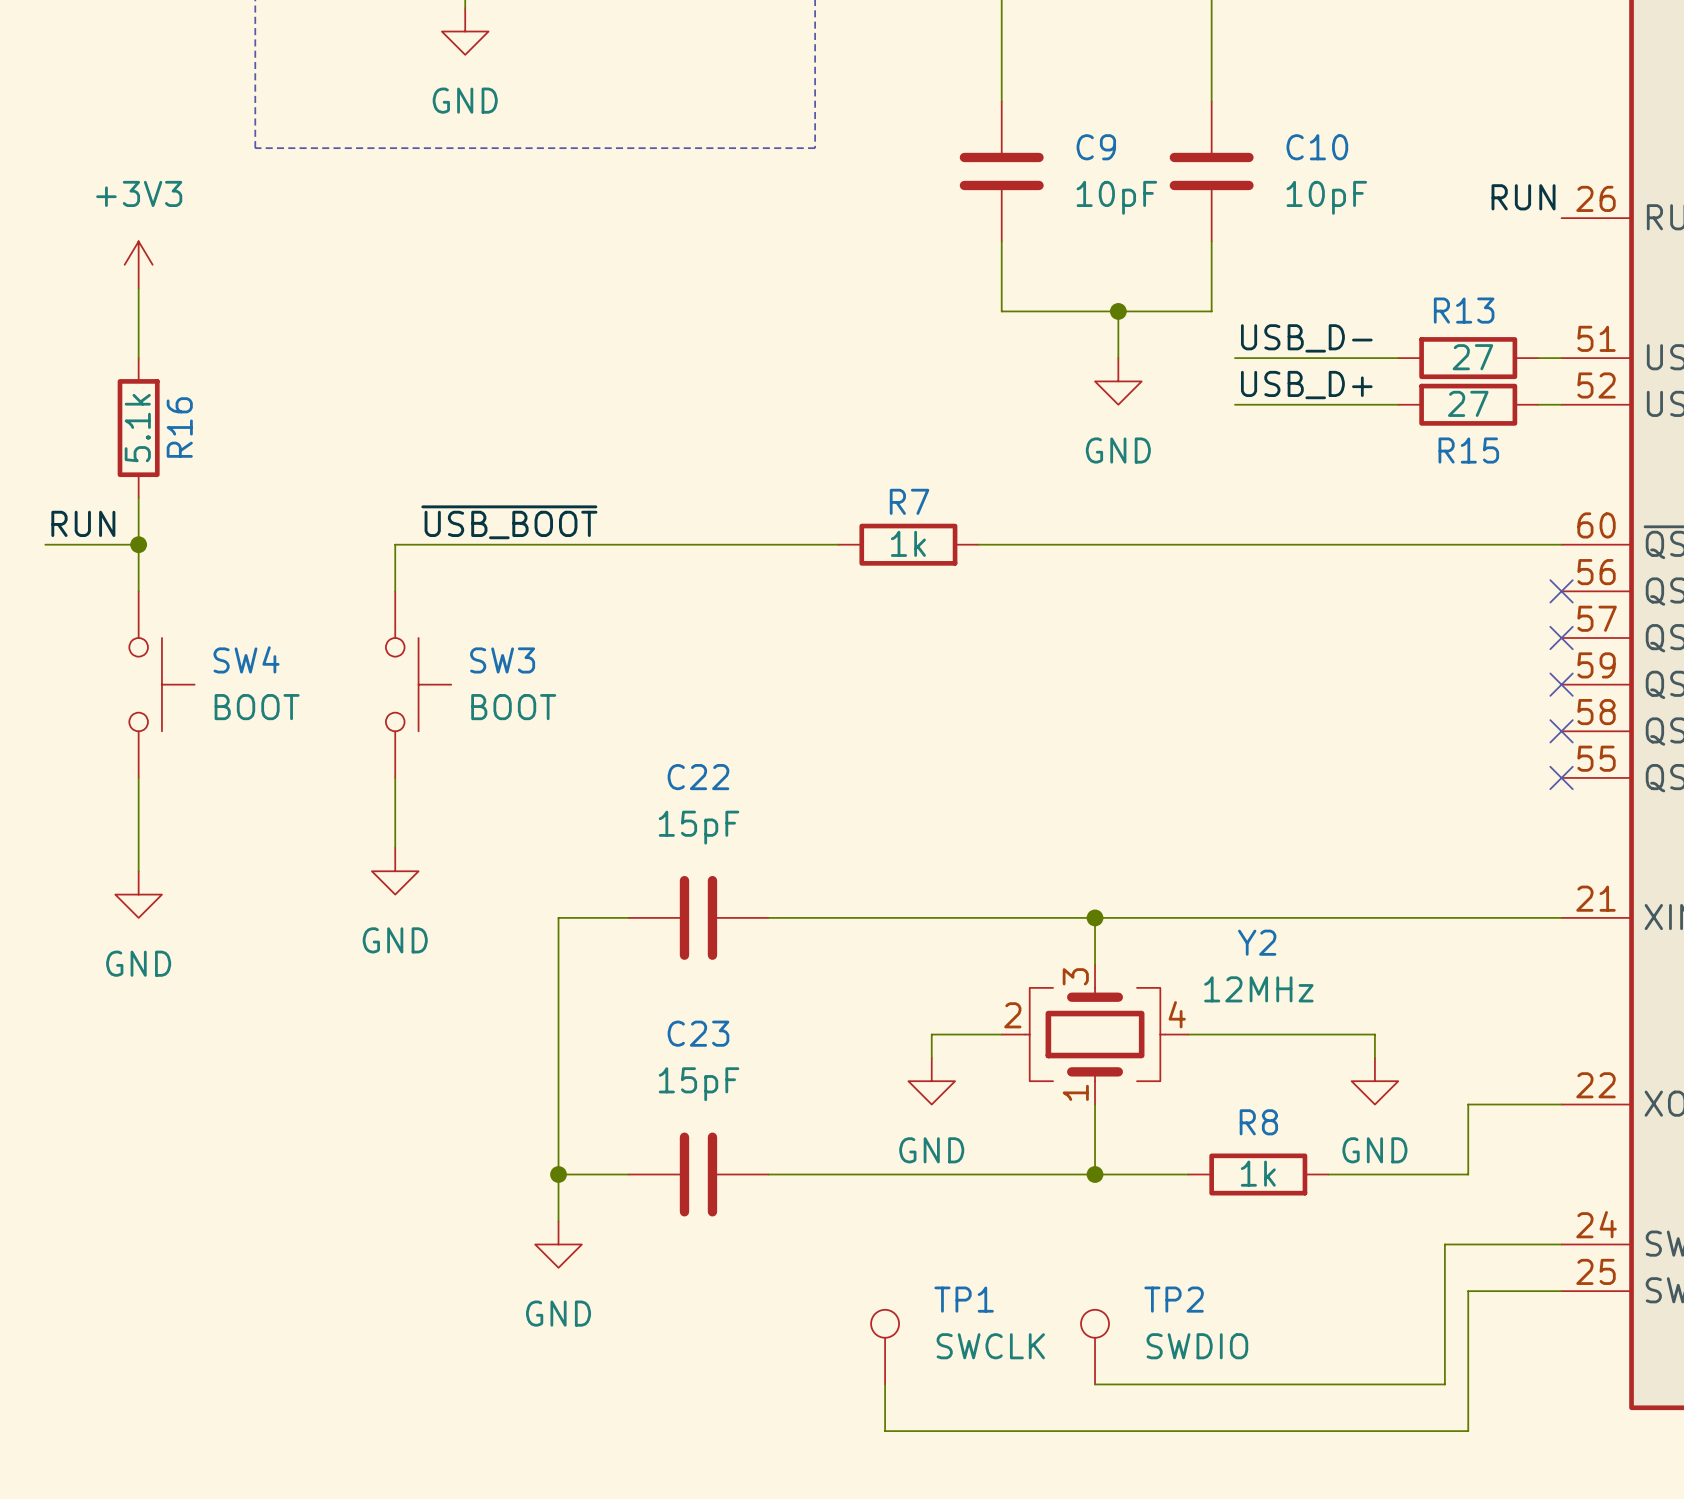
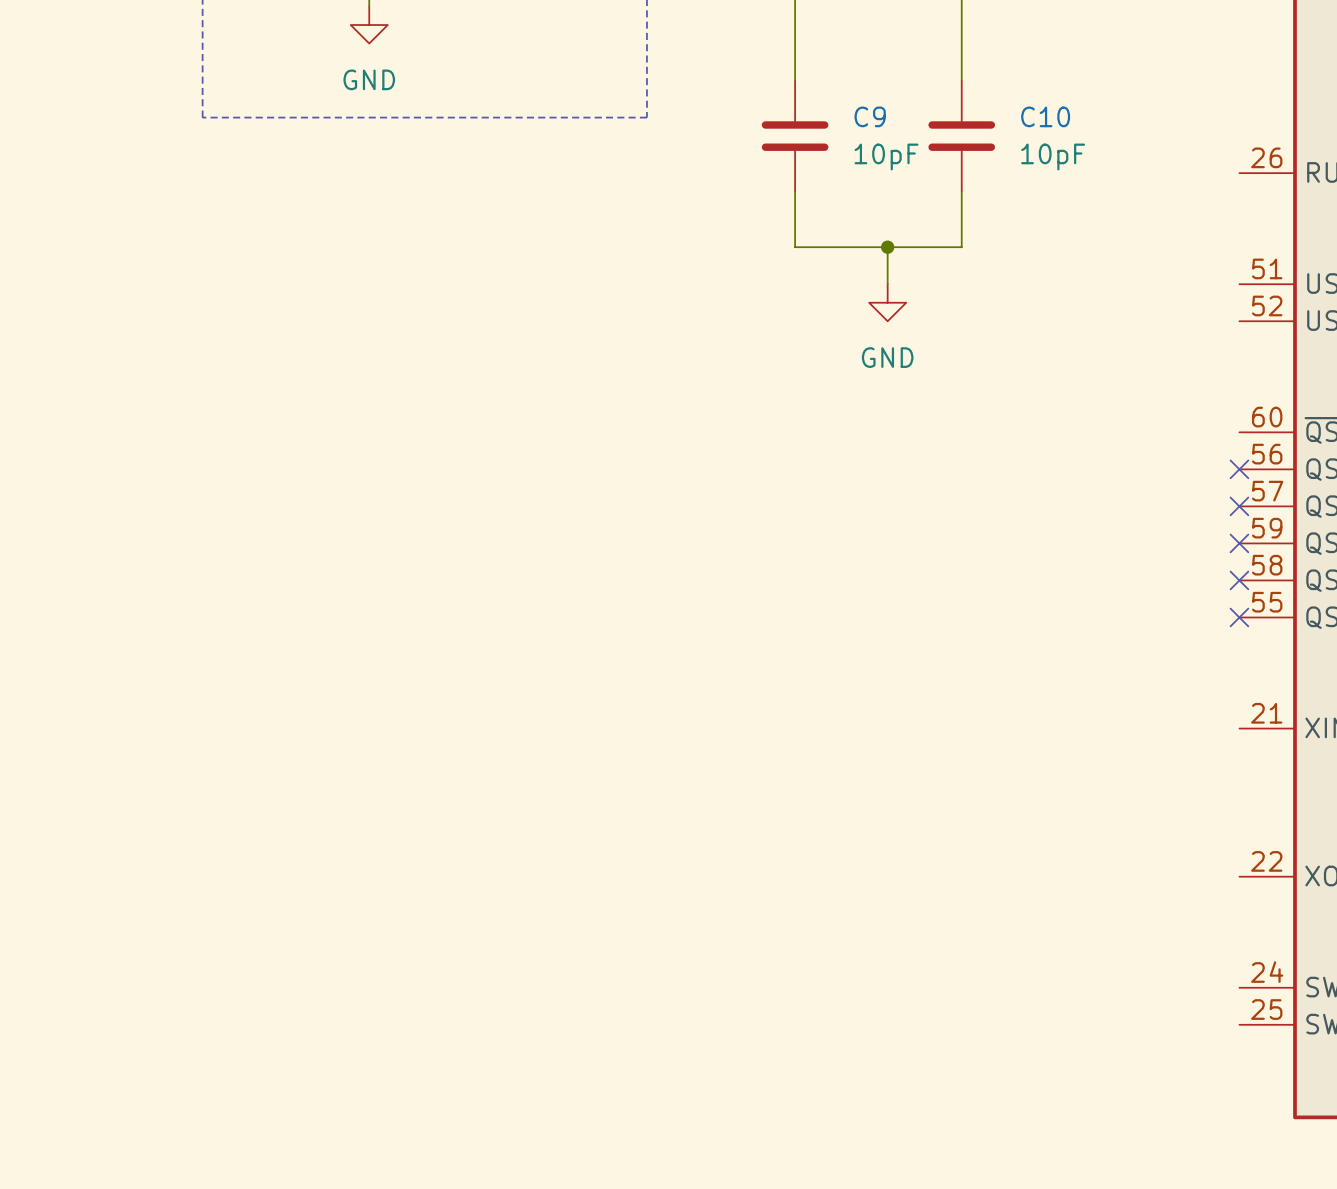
label: RUN (1523, 197) -> none
power symbol: +3V3 (138, 264) -> none
wire: (138, 288) (138, 358) -> none
label: USB_D- (1306, 338) -> none
wire: (1234, 358) (1398, 358) -> none
R13: 27 (1468, 358) -> none
wire: (1538, 358) (1561, 358) -> none
label: USB_D+ (1306, 385) -> none
wire: (1234, 404) (1398, 404) -> none
R15: 27 (1468, 404) -> none
wire: (1538, 404) (1561, 404) -> none
R16: 5.1k (138, 428) -> none
wire: (138, 498) (138, 591) -> none
label: ~{USB_BOOT} (509, 522) -> none
label: RUN (83, 523) -> none
wire: (45, 544) (138, 544) -> none
junction: (138, 544) -> none
wire: (838, 544) (395, 544) (395, 591) -> none
R7: 1k (908, 544) -> none
wire: (978, 544) (1561, 544) -> none
SW4: BOOT (161, 684) -> none
SW3: BOOT (418, 684) -> none
wire: (138, 777) (138, 871) -> none
wire: (395, 777) (395, 847) -> none
power symbol: GND (395, 871) -> none
power symbol: GND (138, 894) -> none
wire: (628, 917) (558, 917) (558, 1221) -> none
C22: 15pF (698, 917) -> none
wire: (768, 917) (1561, 917) -> none
wire: (1095, 917) (1095, 964) -> none
junction: (1095, 917) -> none
wire: (1001, 1034) (931, 1034) (931, 1057) -> none
Y2: 12MHz (1095, 1034) -> none
wire: (1188, 1034) (1374, 1034) (1374, 1057) -> none
power symbol: GND (931, 1081) -> none
power symbol: GND (1374, 1081) -> none
wire: (1095, 1104) (1095, 1174) -> none
wire: (1561, 1104) (1468, 1104) (1468, 1174) (1328, 1174) -> none
wire: (558, 1174) (628, 1174) -> none
junction: (558, 1174) -> none
C23: 15pF (698, 1174) -> none
wire: (768, 1174) (1188, 1174) -> none
junction: (1095, 1174) -> none
R8: 1k (1258, 1174) -> none
power symbol: GND (558, 1244) -> none
wire: (1561, 1244) (1444, 1244) (1444, 1384) (1095, 1384) -> none
wire: (1561, 1291) (1468, 1291) (1468, 1431) (885, 1431) (885, 1384) -> none
TP1: SWCLK (885, 1347) -> none
TP2: SWDIO (1095, 1347) -> none

